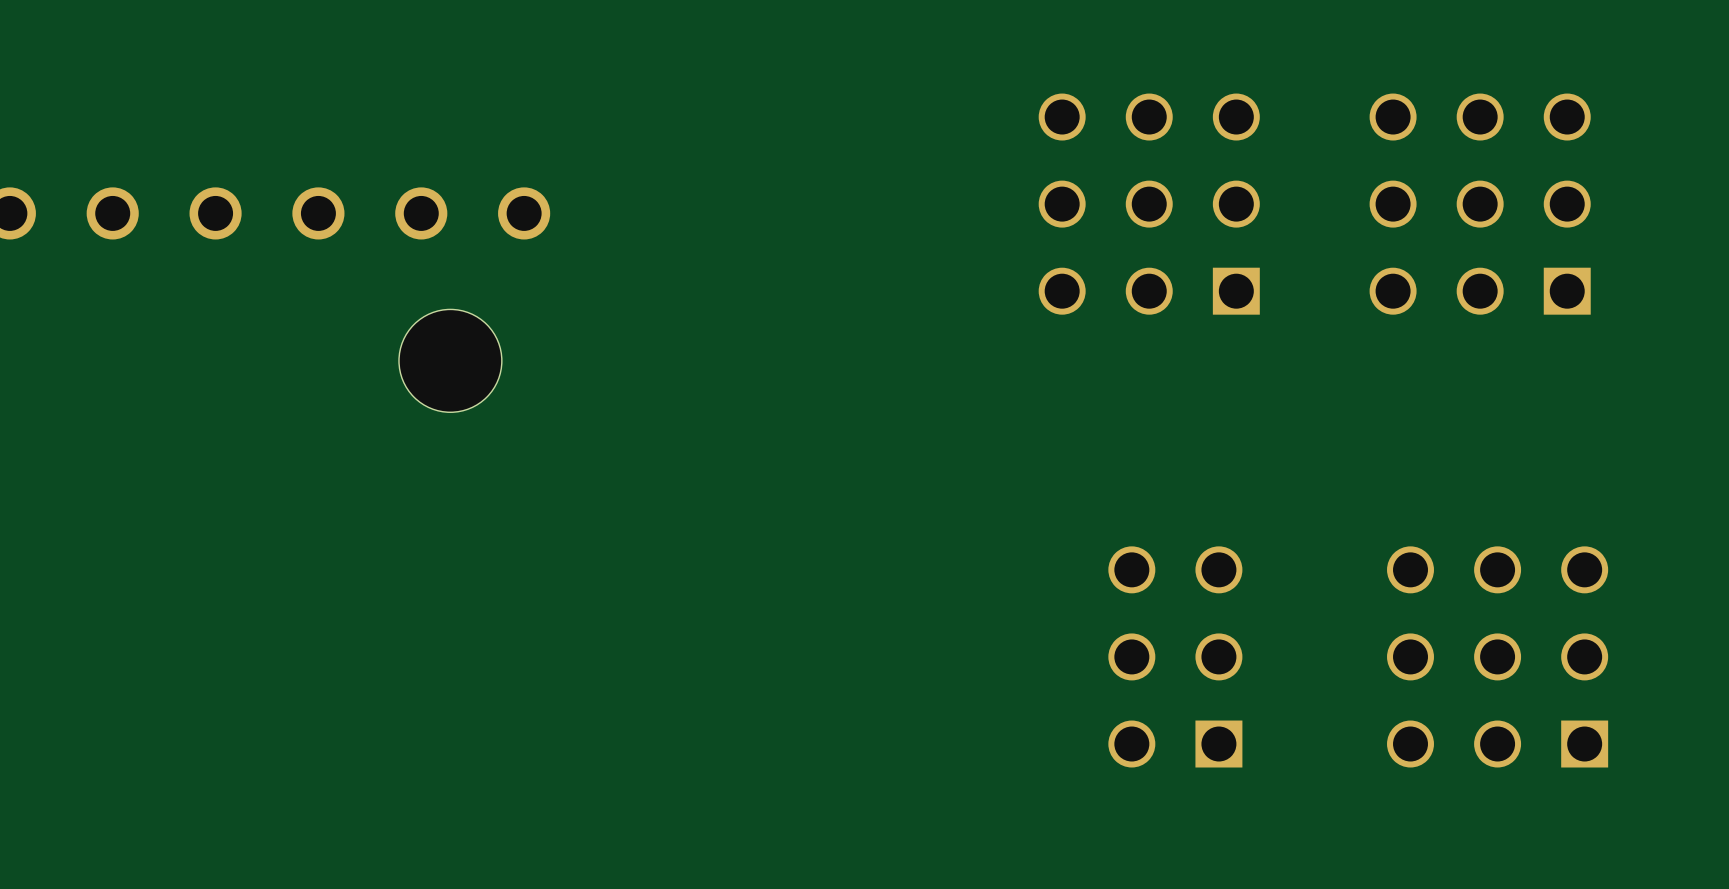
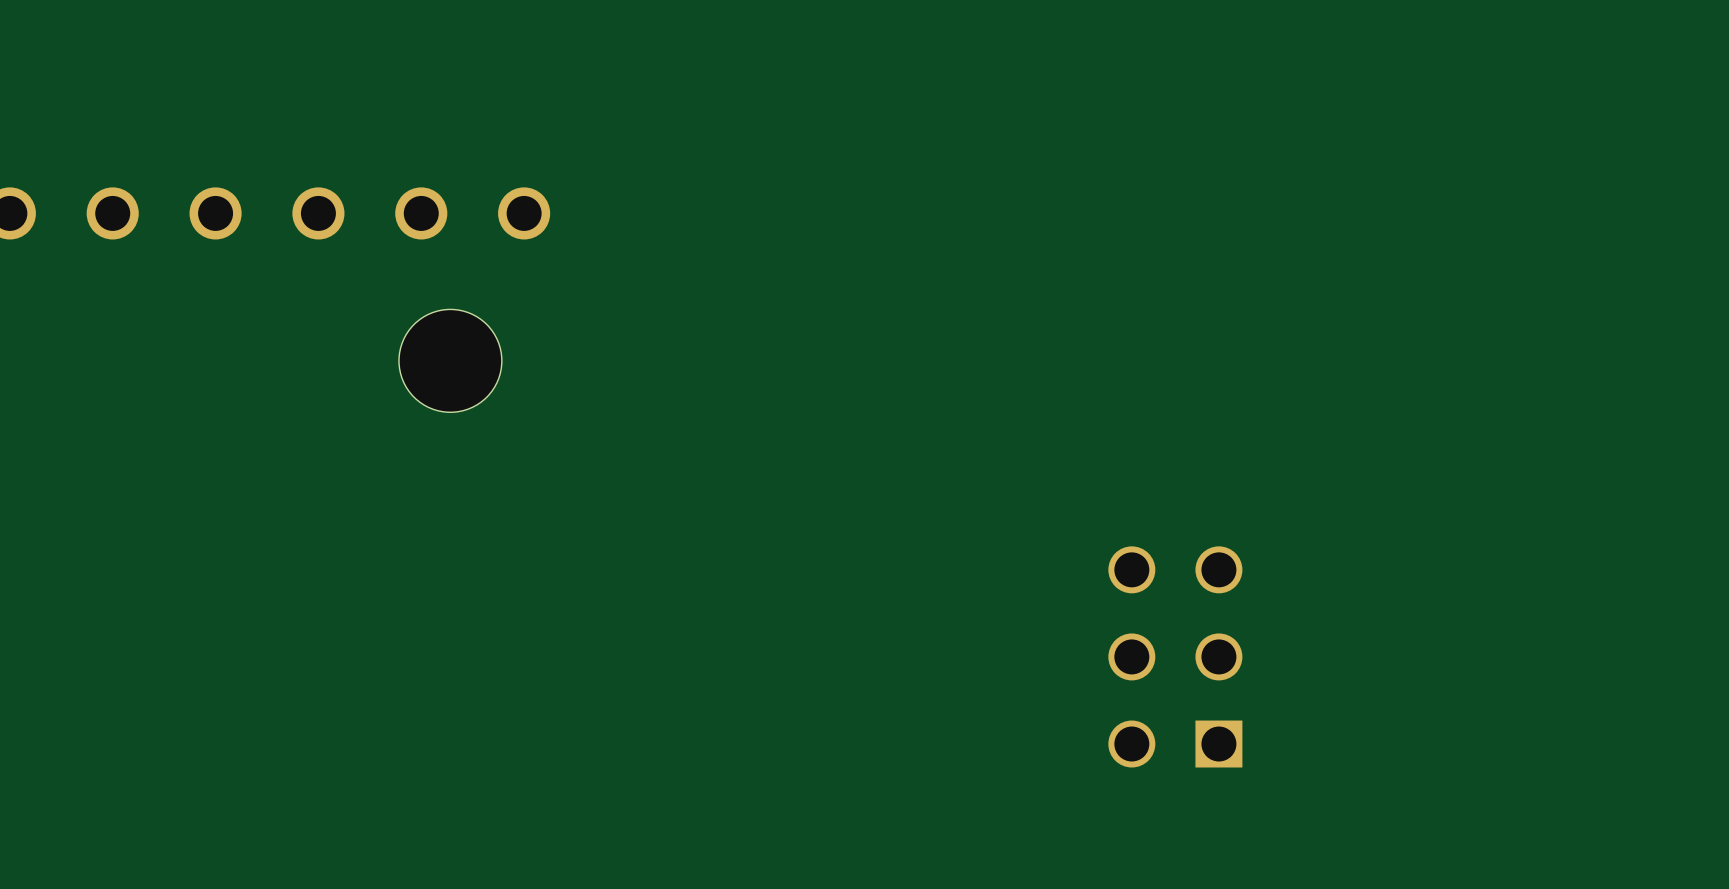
part: (1149, 204) -> none
part: (1480, 204) -> none
part: (1497, 656) -> none

